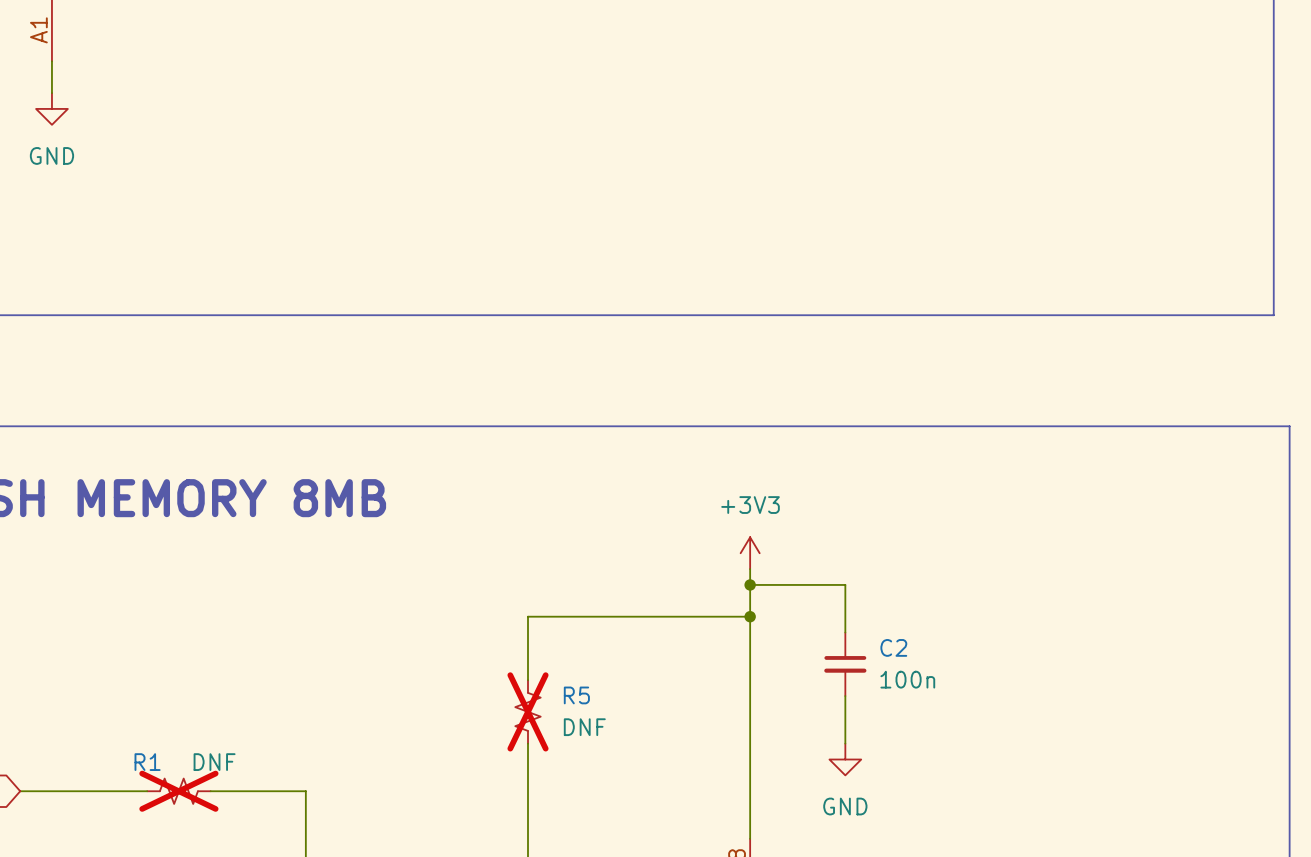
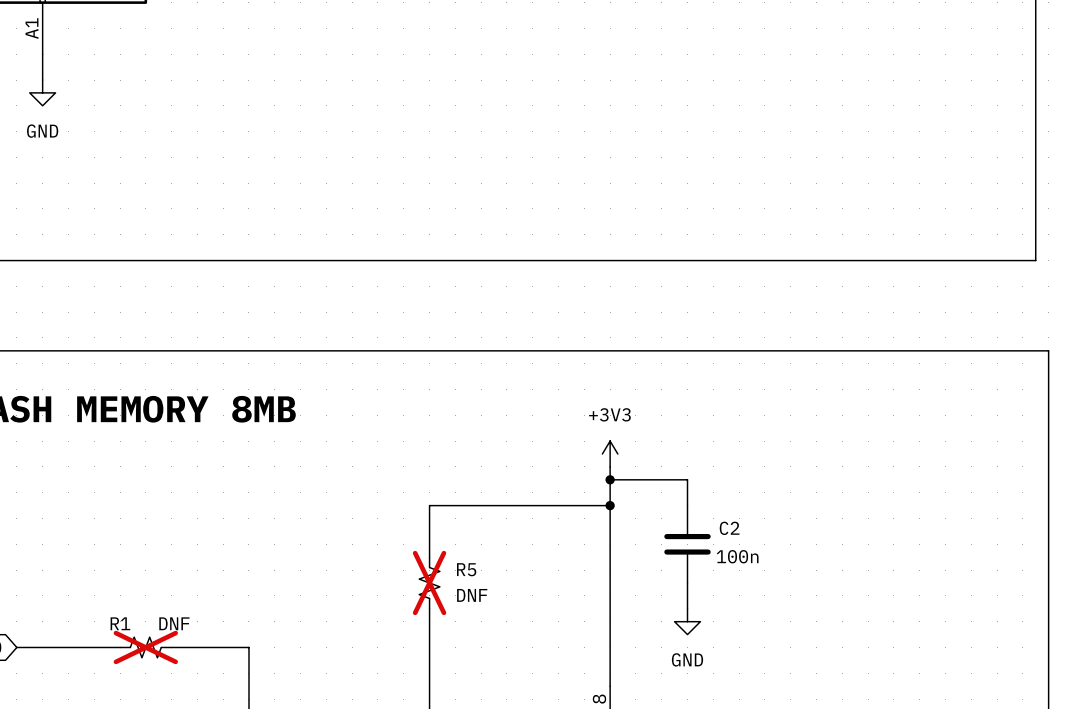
C2 symbol: [824, 632, 867, 697] -> [664, 505, 711, 583]

